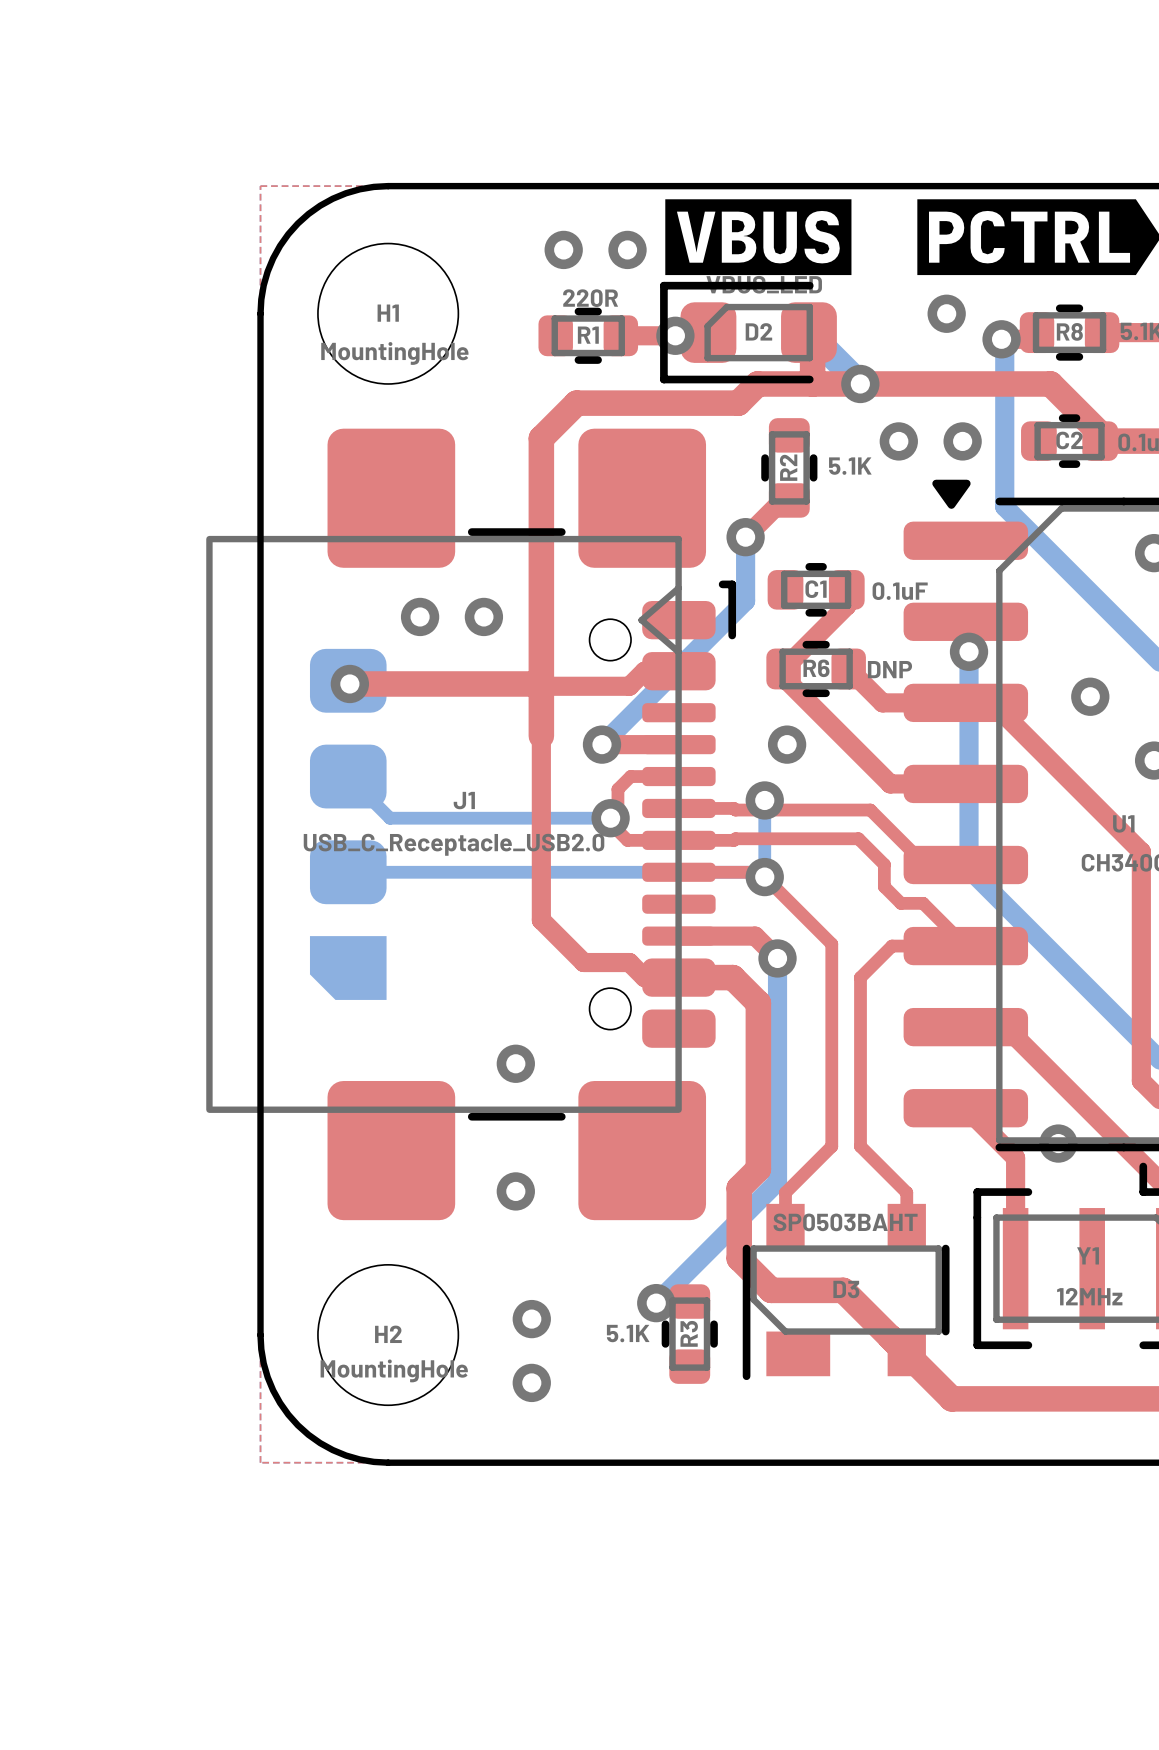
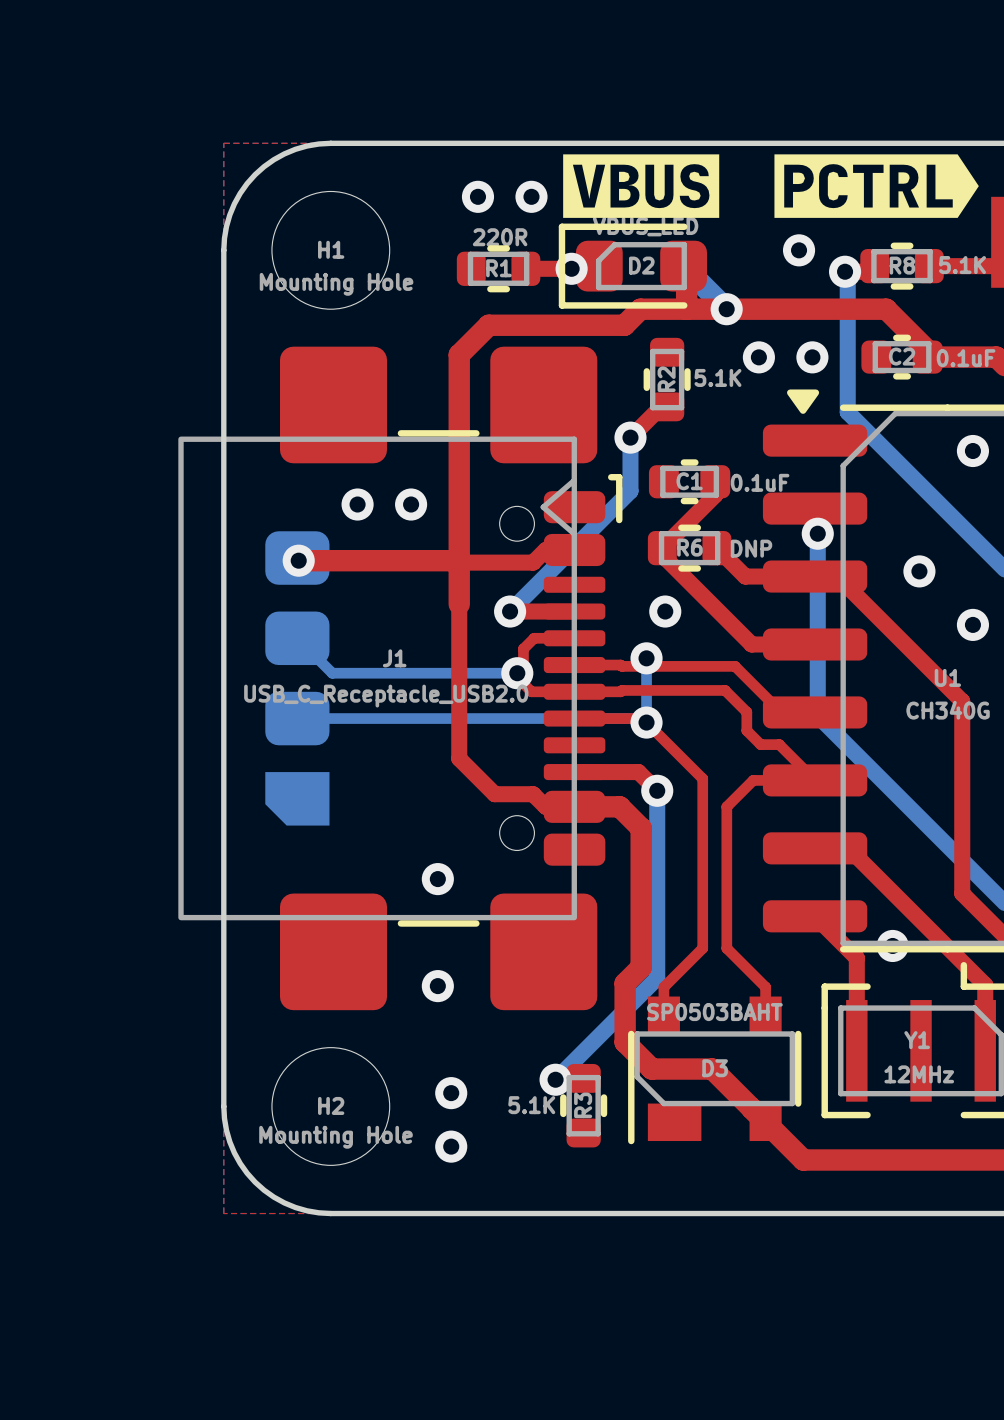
H1 value: MountingHole (394, 353) -> Mounting Hole (336, 284)
H2 value: MountingHole (394, 1370) -> Mounting Hole (335, 1137)

